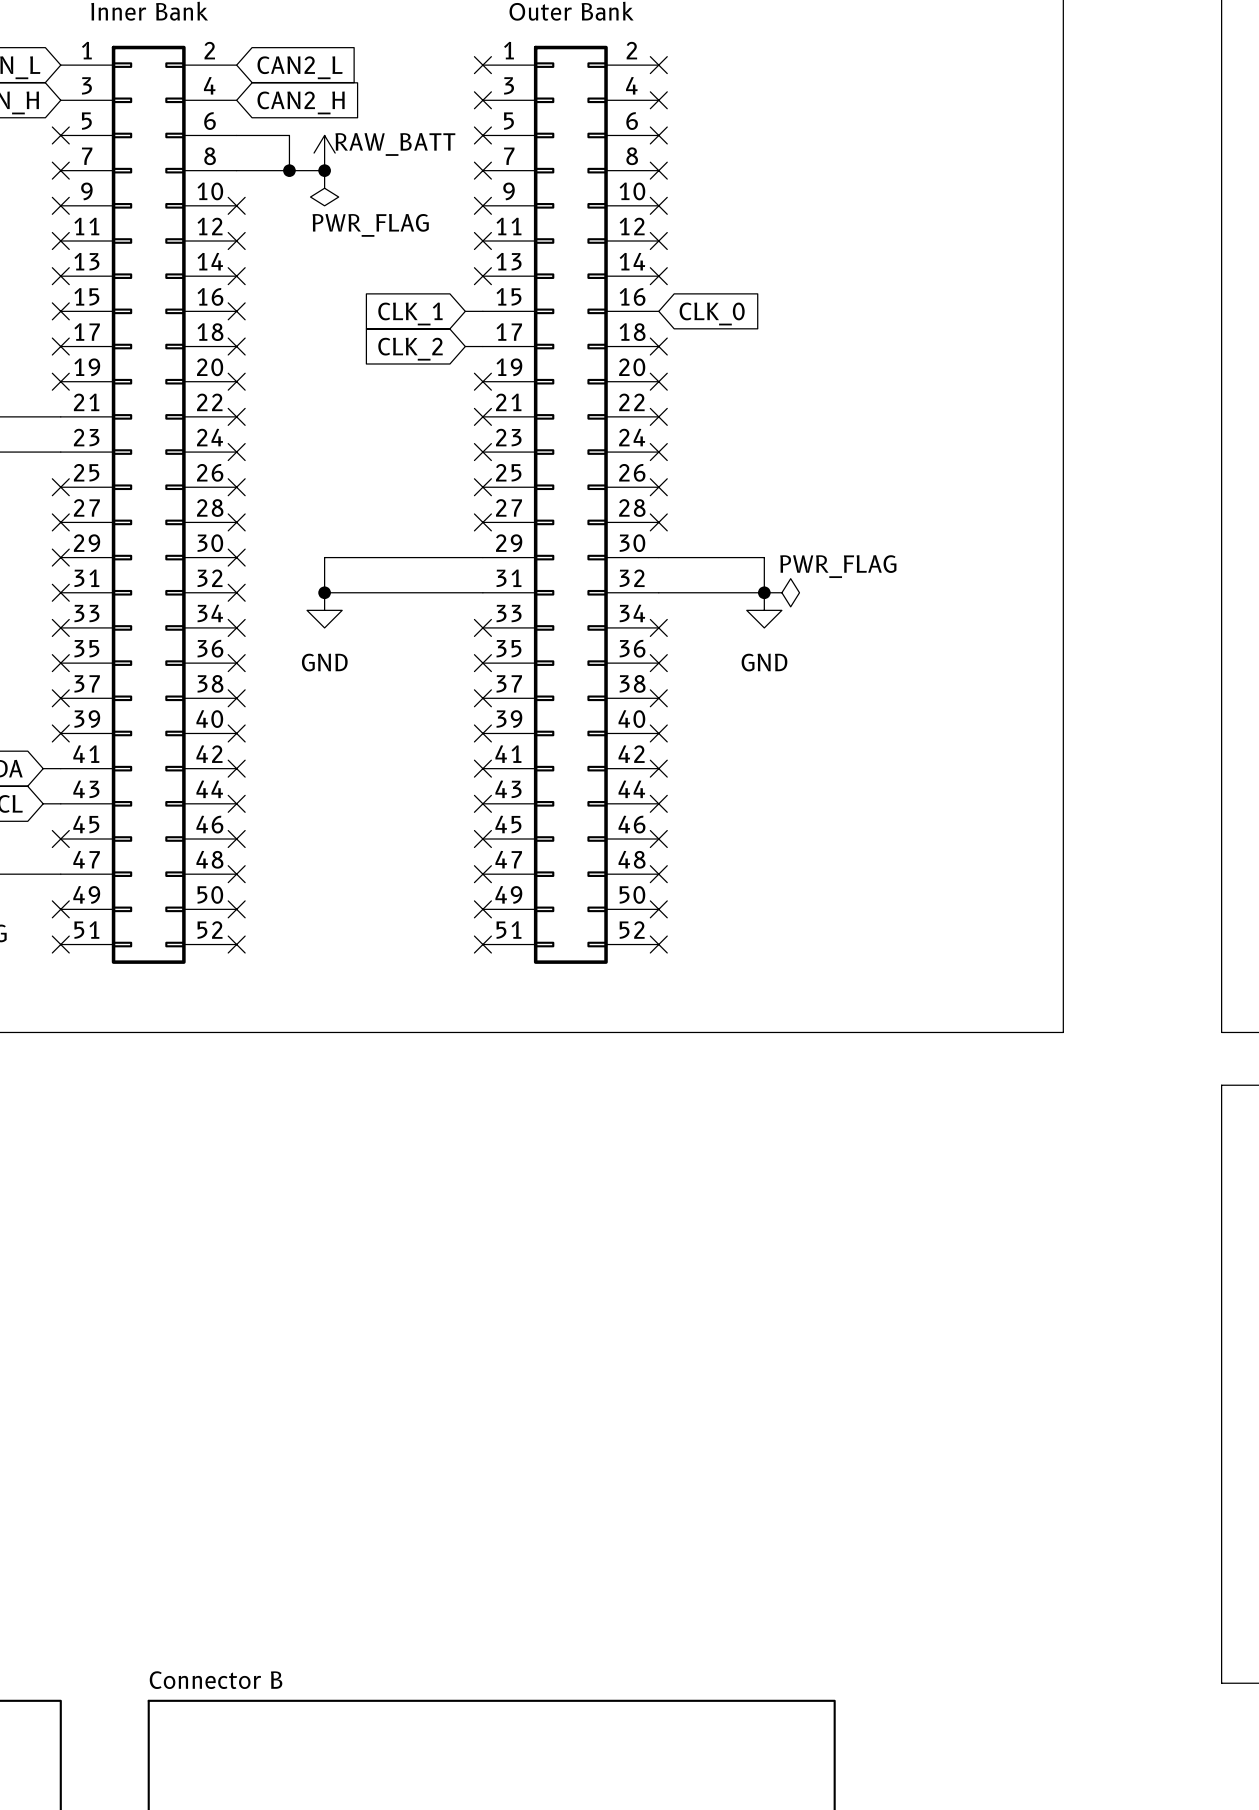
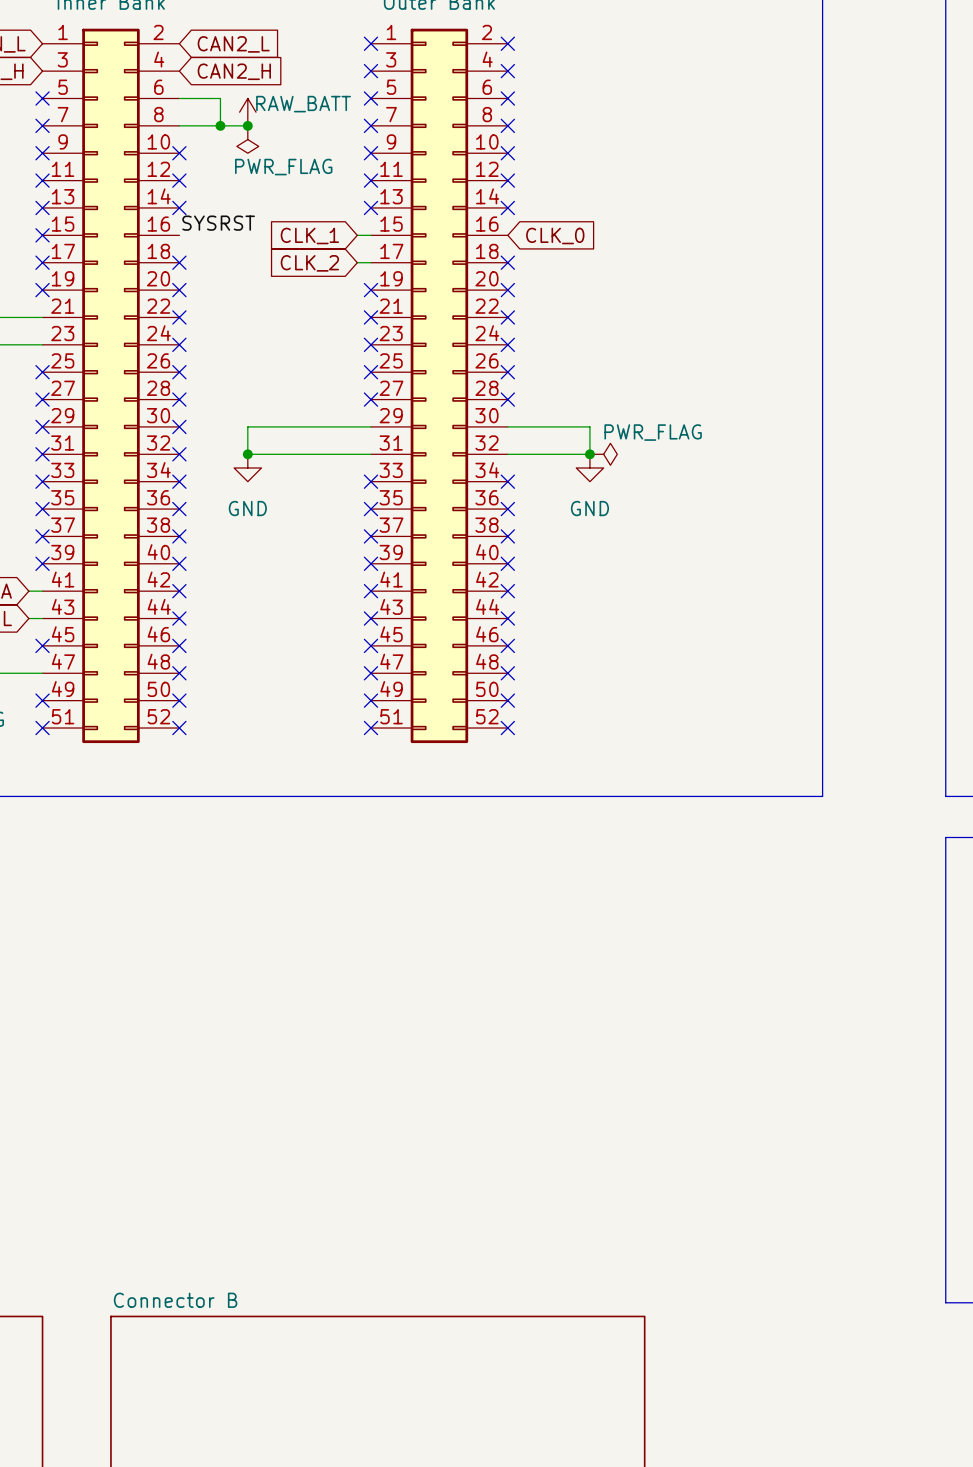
label: none -> SYSRST (218, 223)
no-connect mark: (236, 311) -> none

